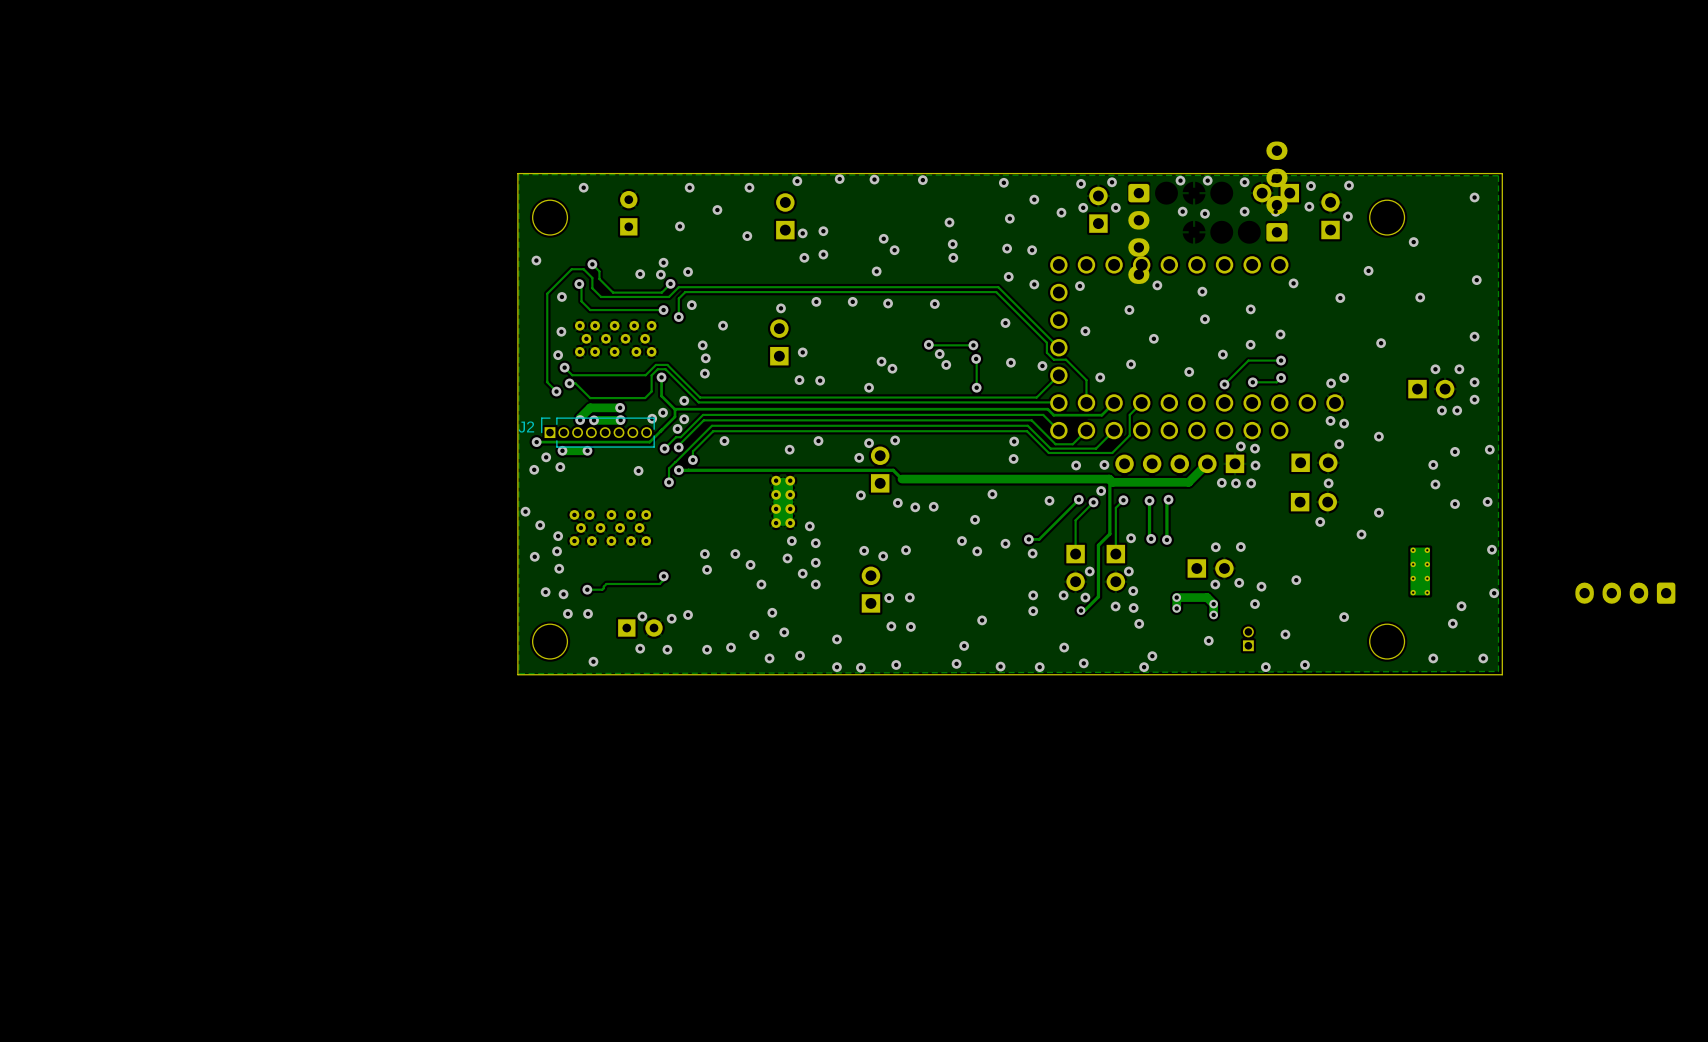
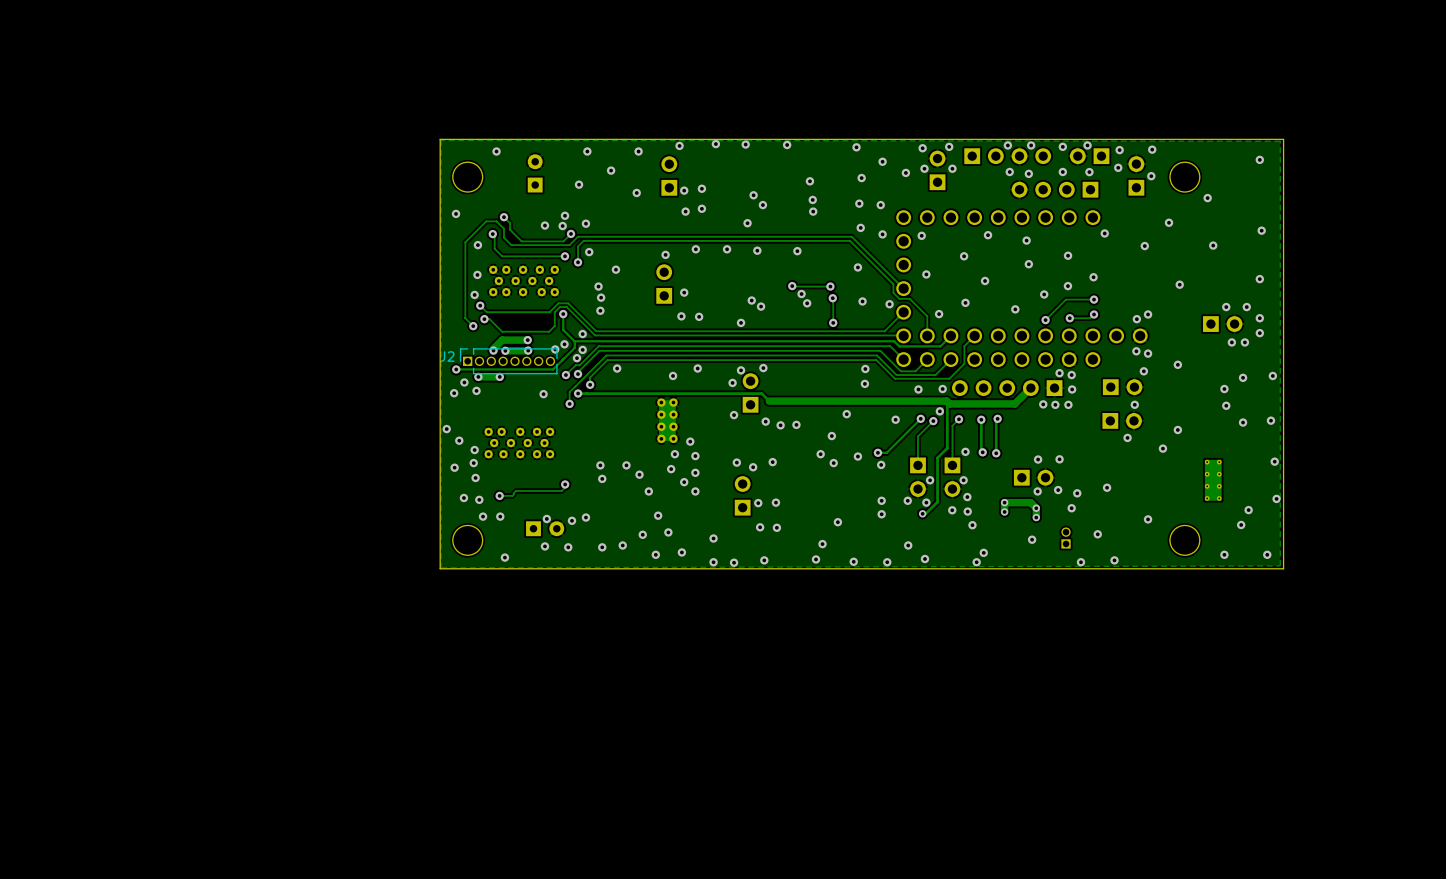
part: (1276, 191) -> none
part: none -> (1007, 156)
part: none -> (1055, 189)
part: (1138, 233) -> none
part: (1625, 593) -> none

